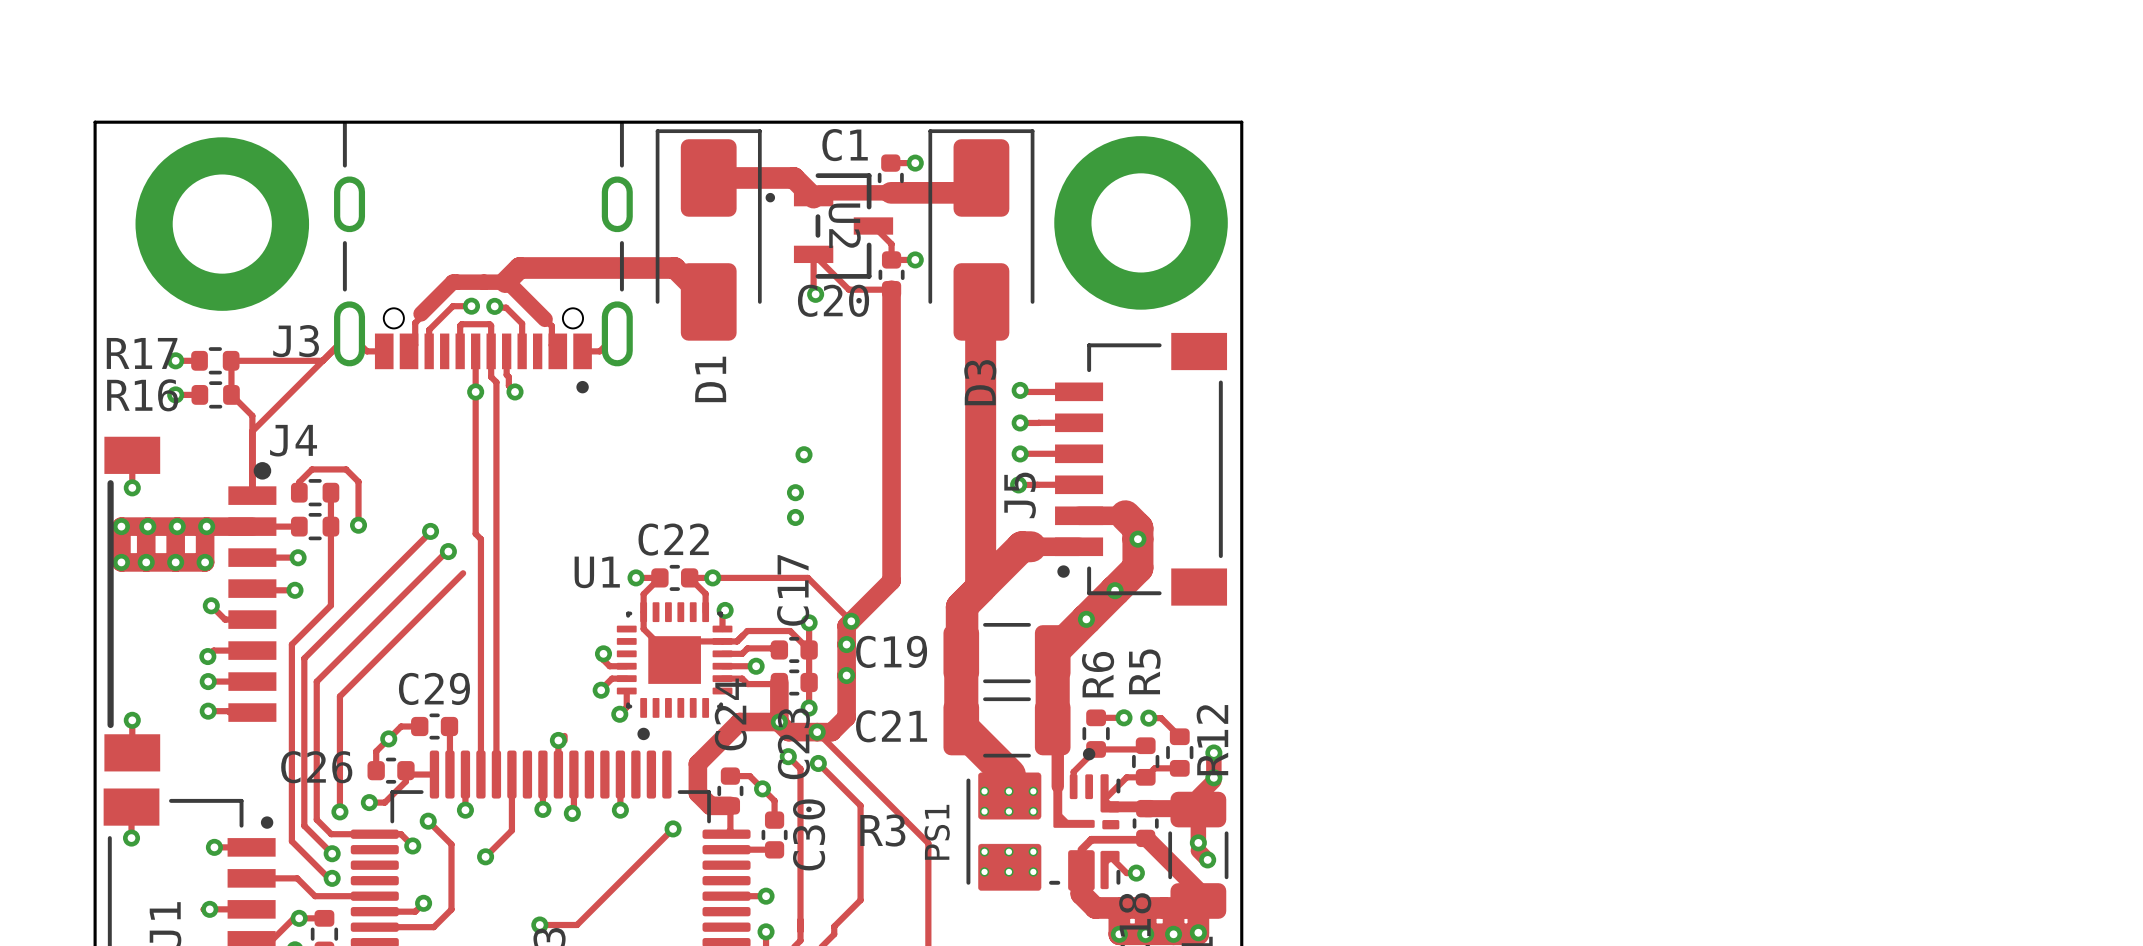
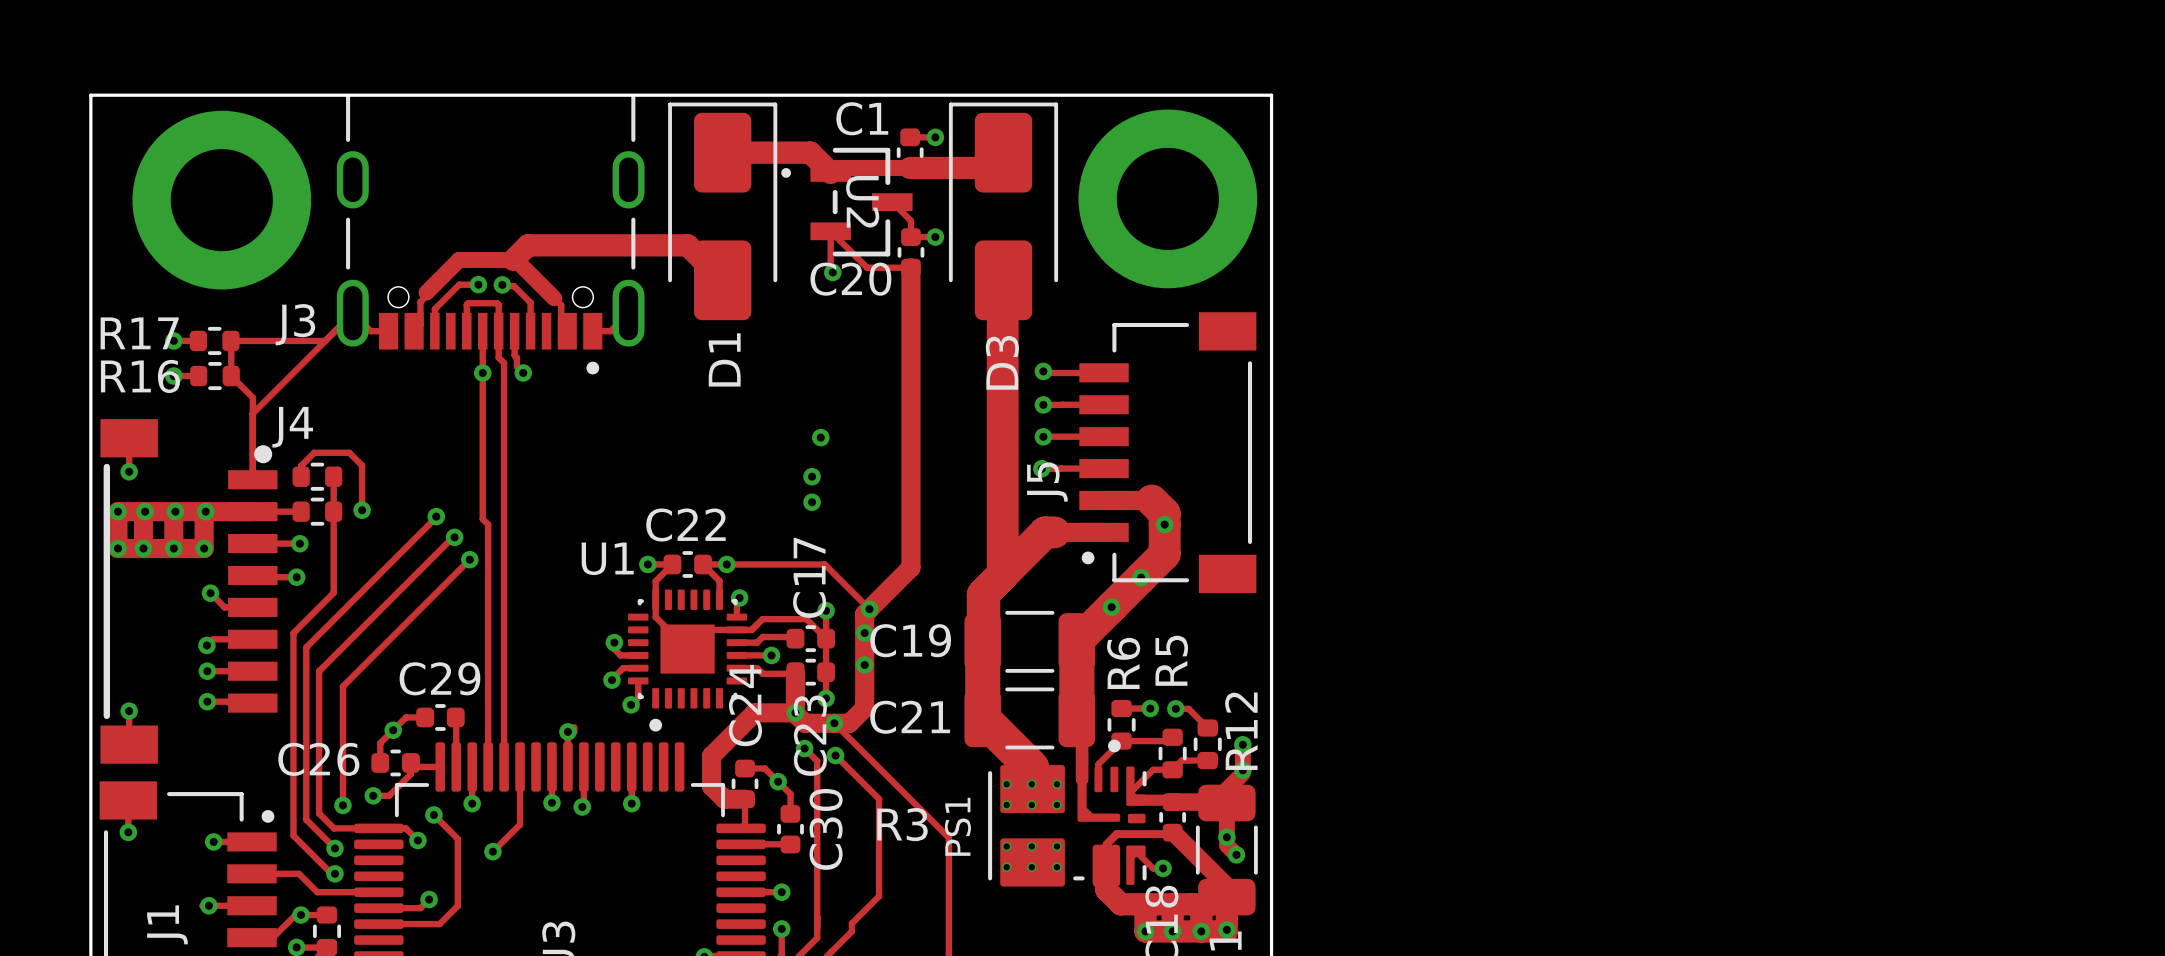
via: none -> (469, 559)
track: (673, 828) (577, 925) (539, 925) -> none
via: (673, 828) -> none
via: (539, 925) -> none

